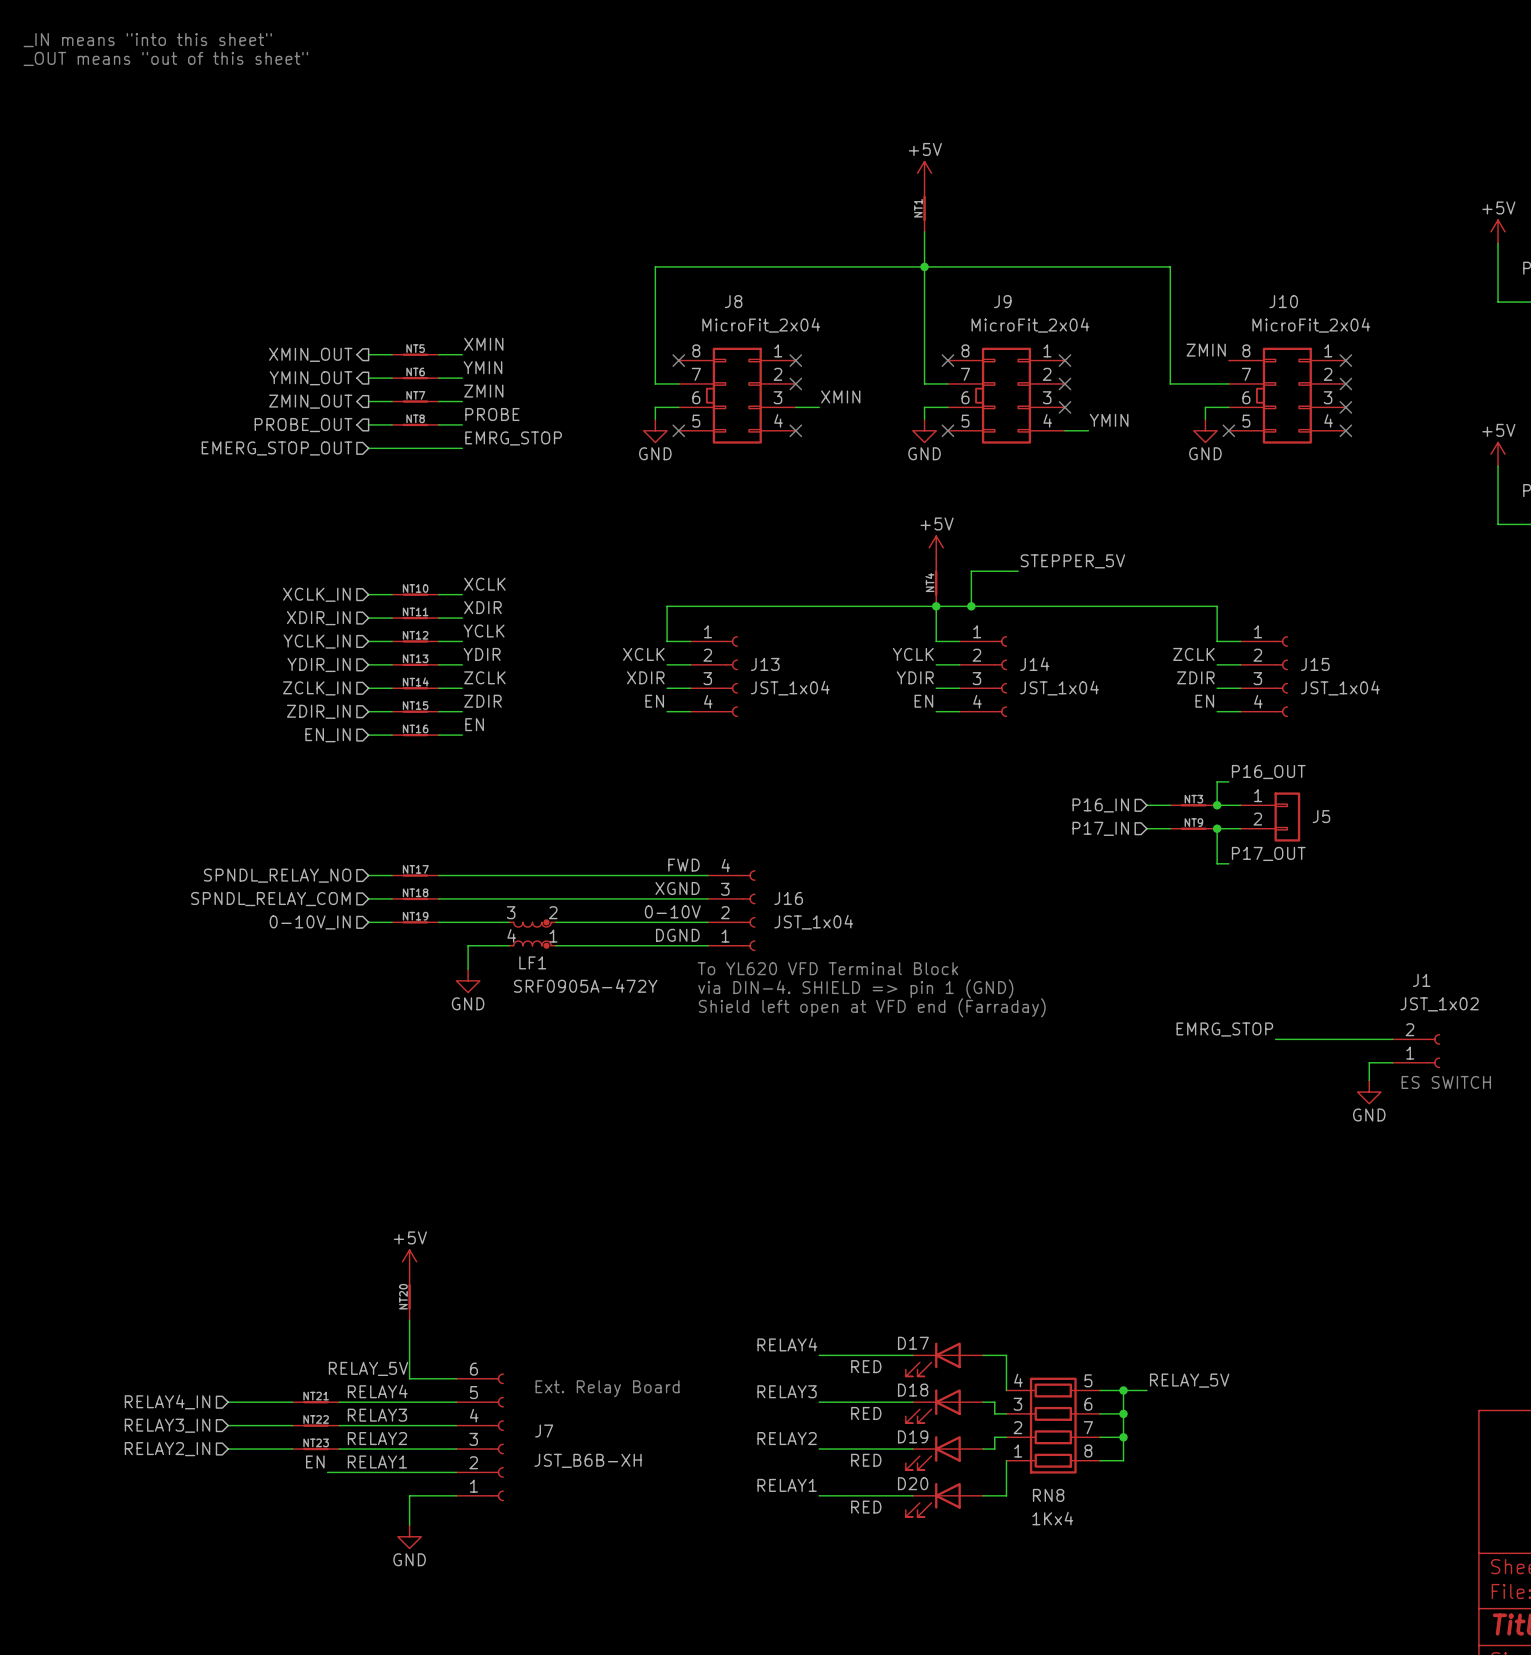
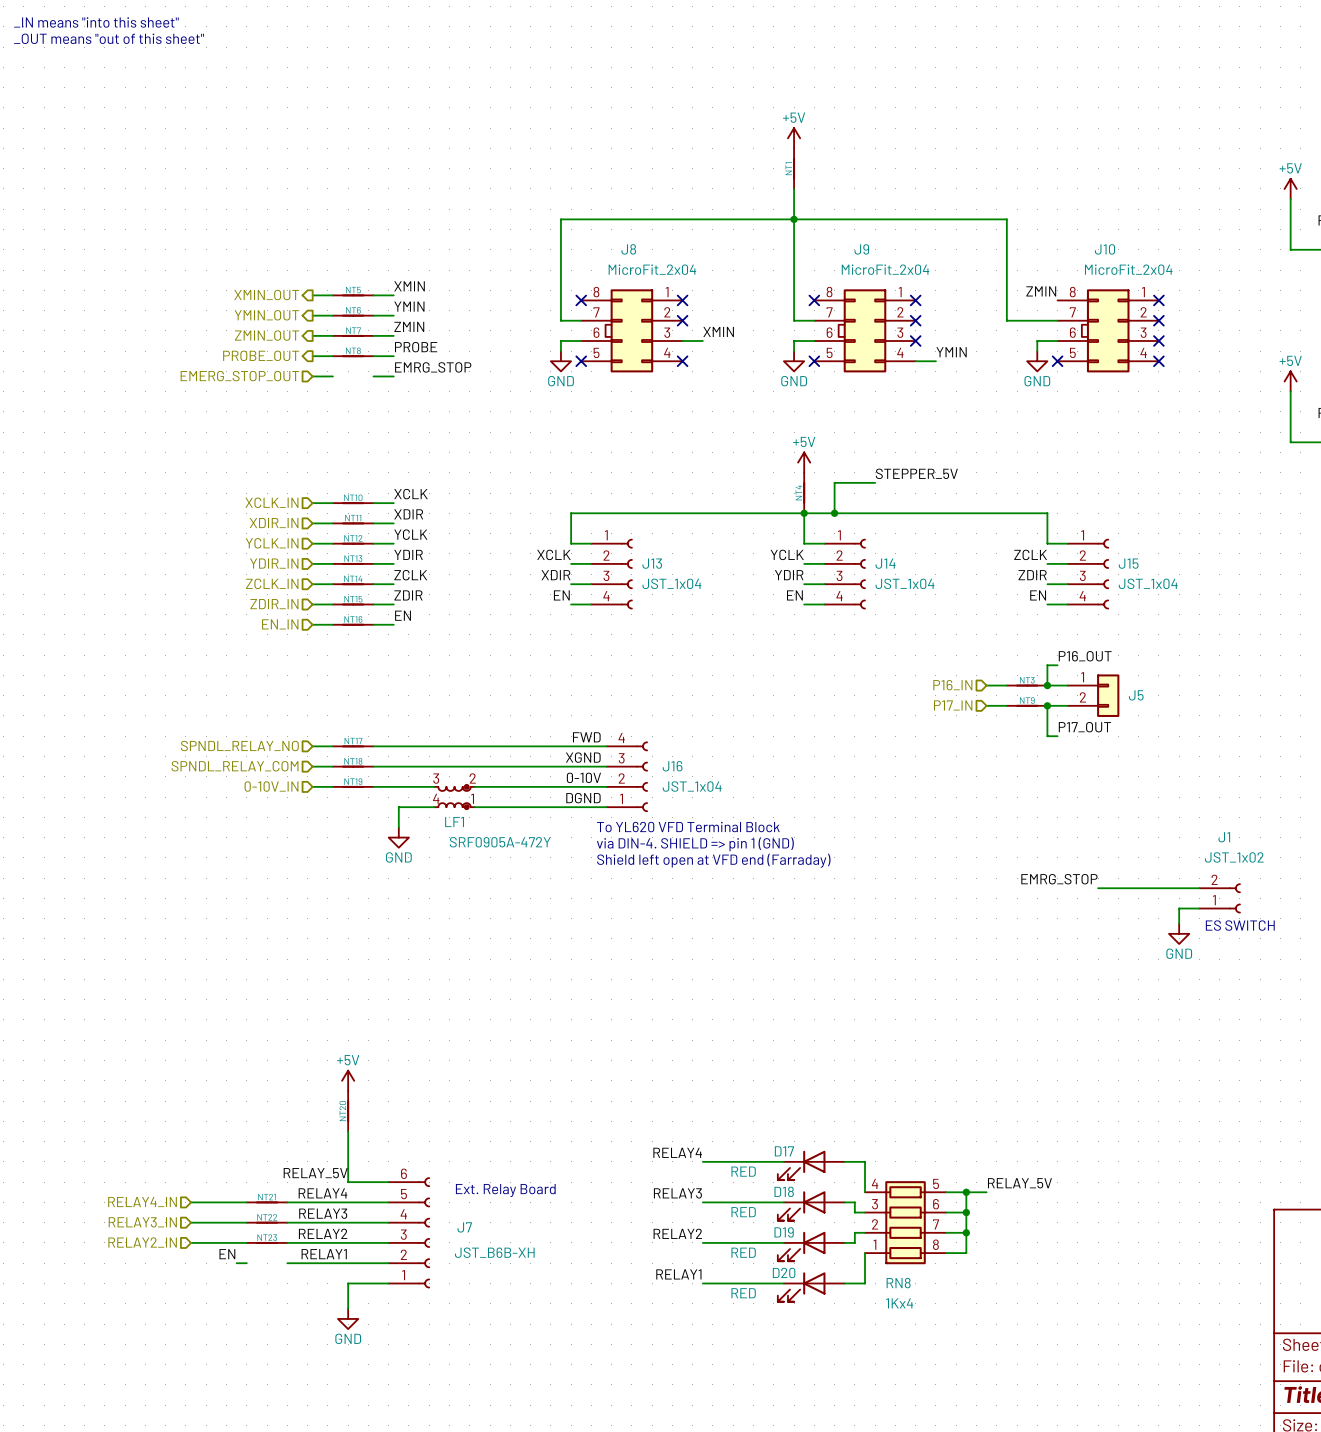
wire: (392, 448) (438, 448) -> none
label position: EN (315, 1461) -> EN (227, 1254)
wire: (327, 1472) (339, 1472) -> (236, 1263) (246, 1263)

